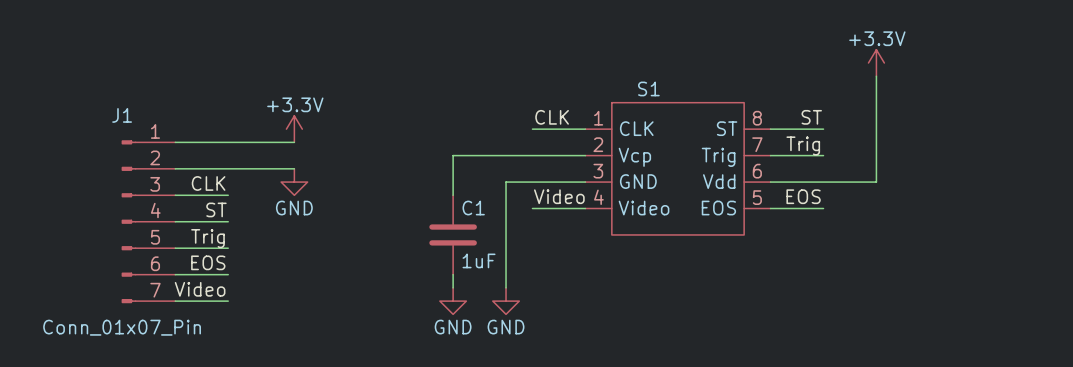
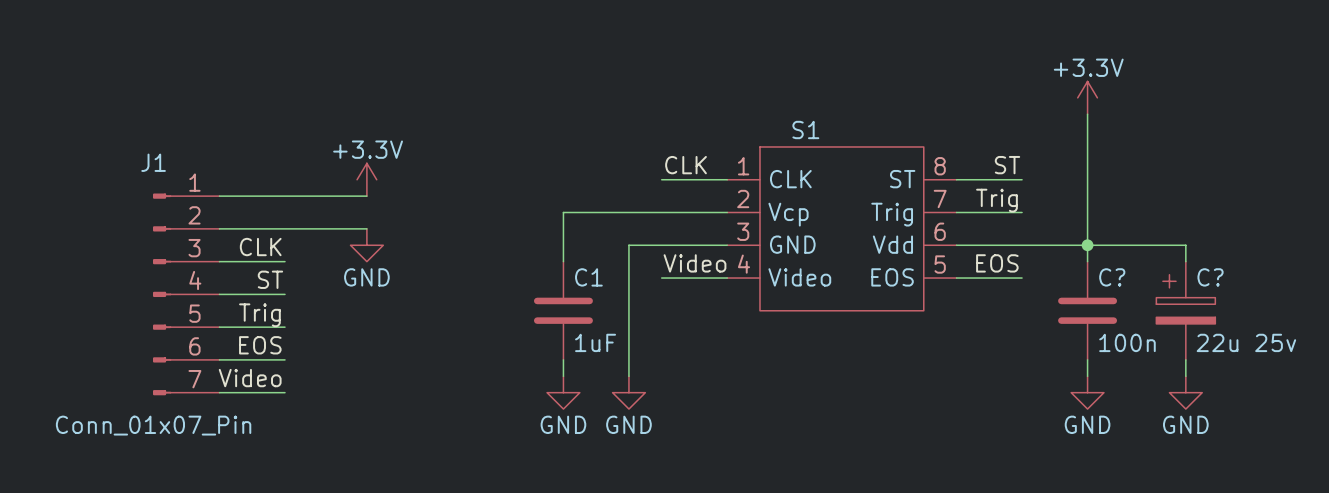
junction: none -> (1087, 245)
wire: none -> (1087, 261) (1087, 245) (1185, 245) (1185, 261)
C?: none -> 100n (1087, 310)
C?: none -> 22u 25v (1185, 310)
wire: none -> (1087, 359) (1087, 376)
wire: none -> (1185, 359) (1185, 376)
power symbol: none -> GND (1087, 392)
power symbol: none -> GND (1185, 392)

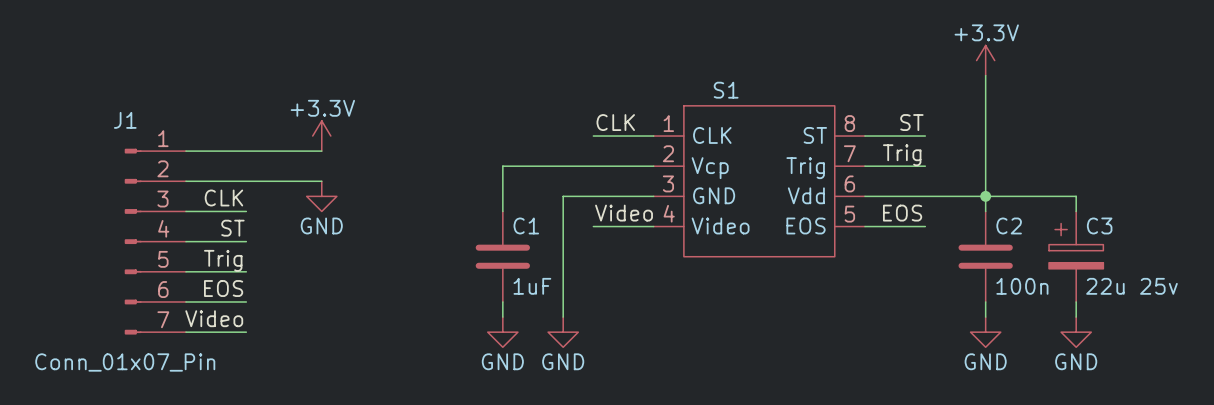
C? name: C? (1112, 277) -> C2 (1009, 225)
C? name: C? (1210, 277) -> C3 (1099, 225)

